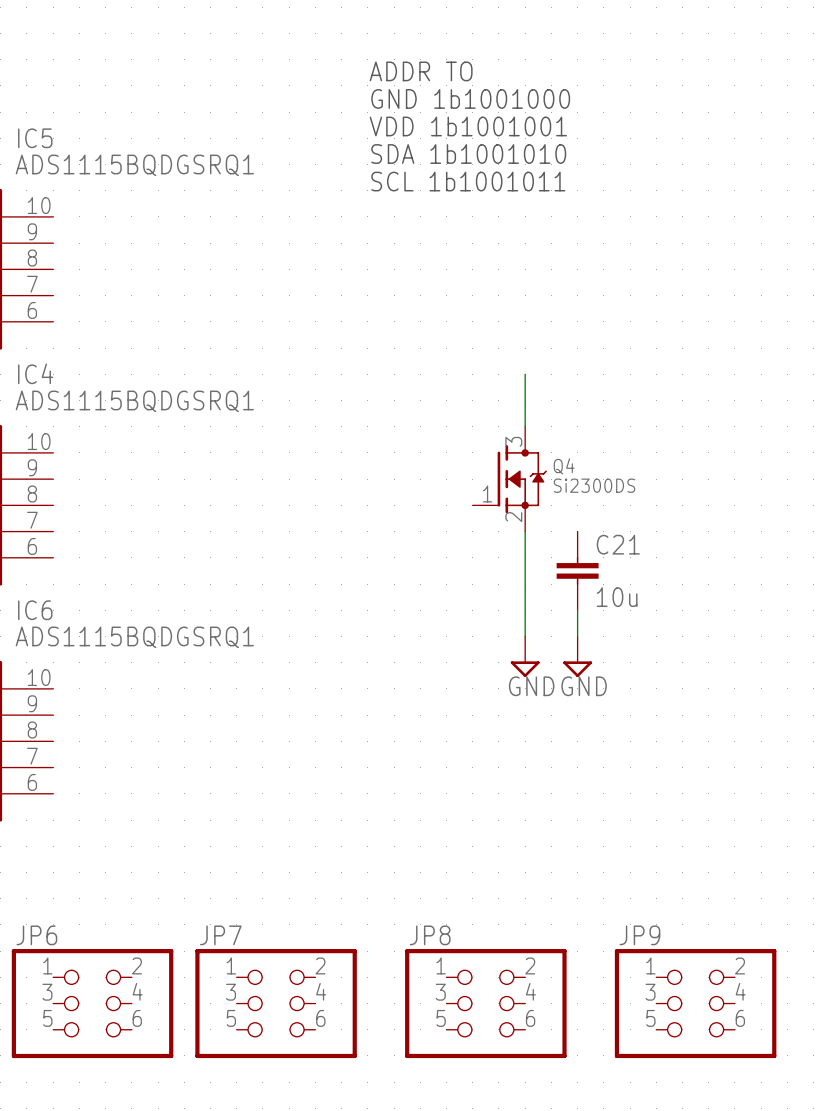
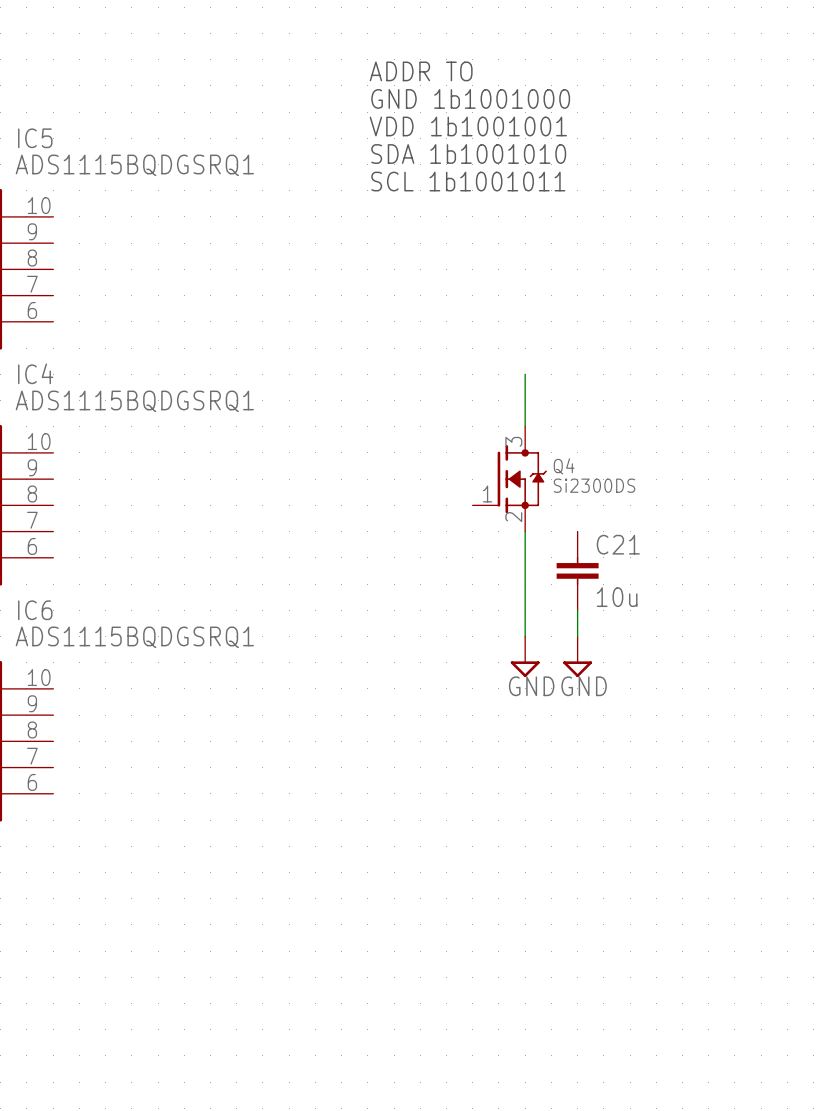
JP6: (92, 1003) -> none
JP7: (276, 1003) -> none
JP8: (485, 1003) -> none
JP9: (695, 1003) -> none

